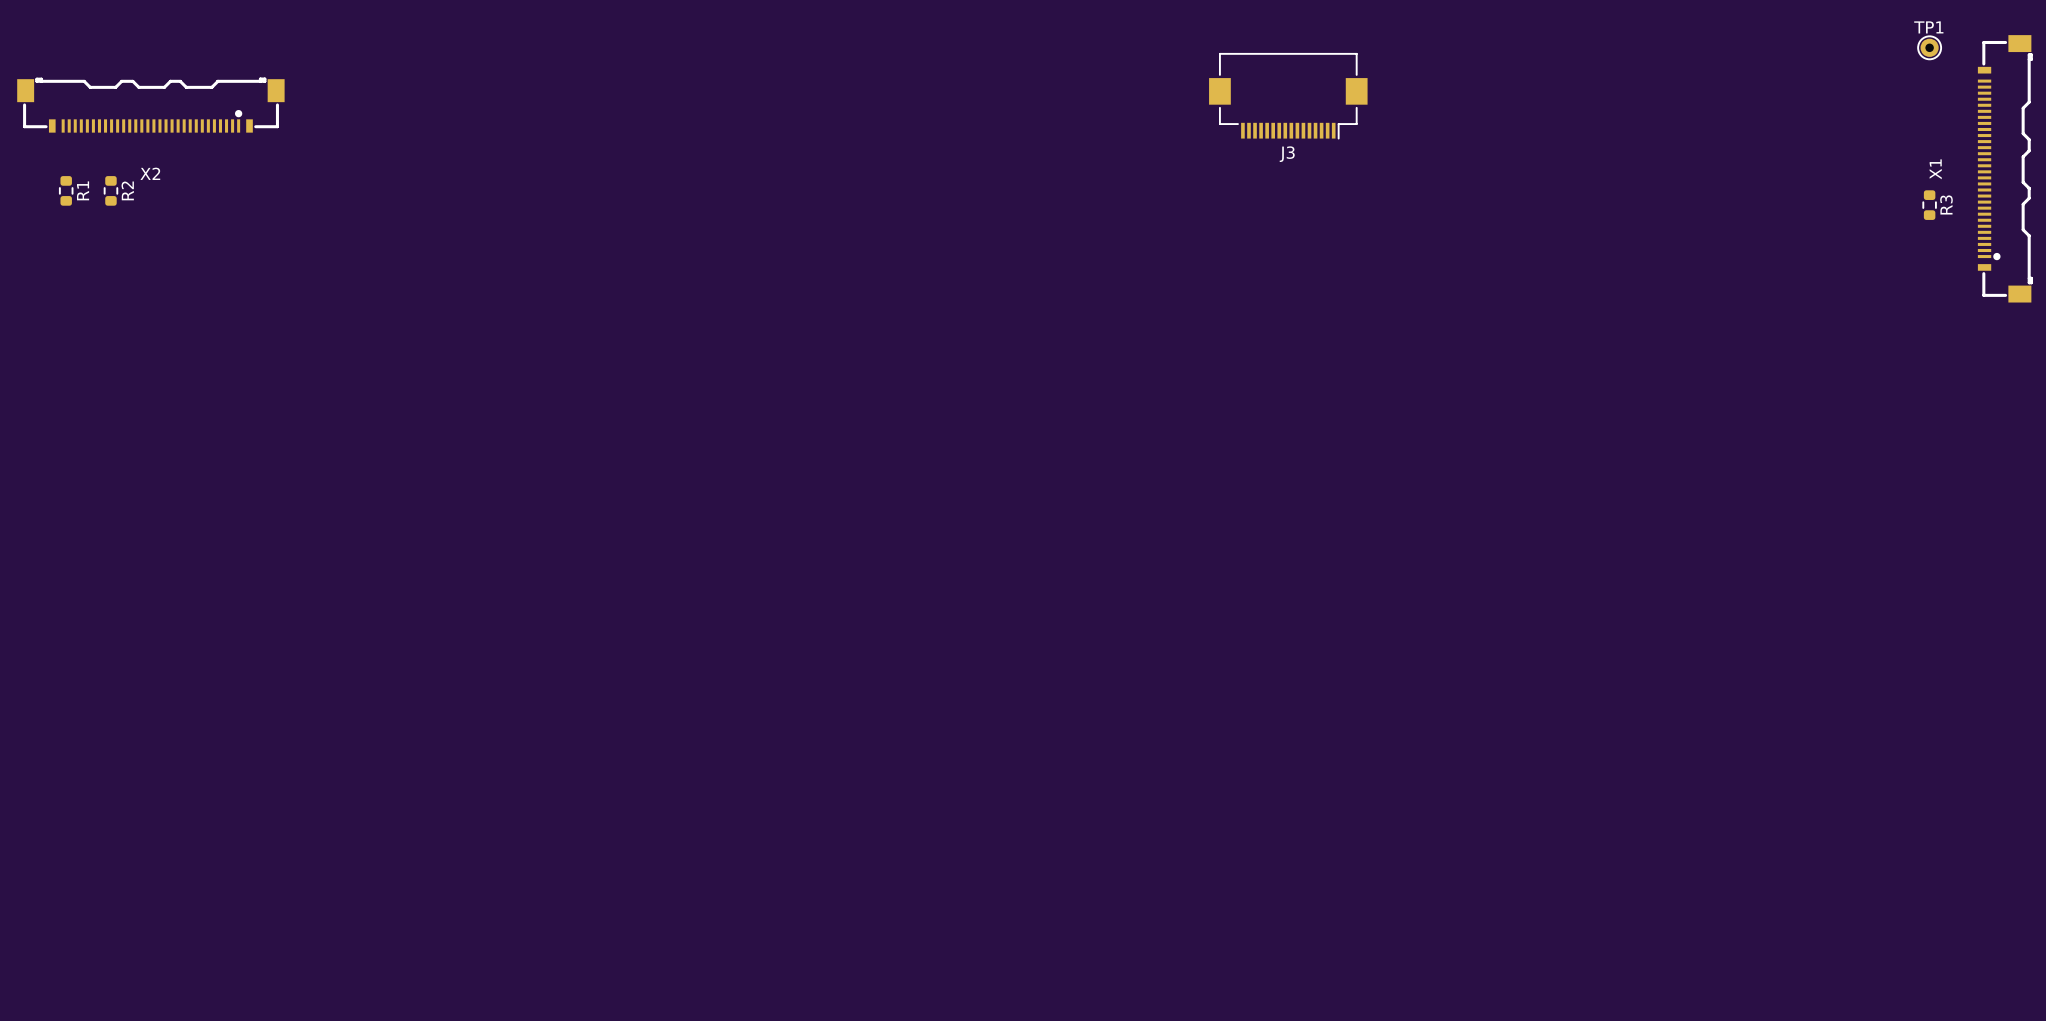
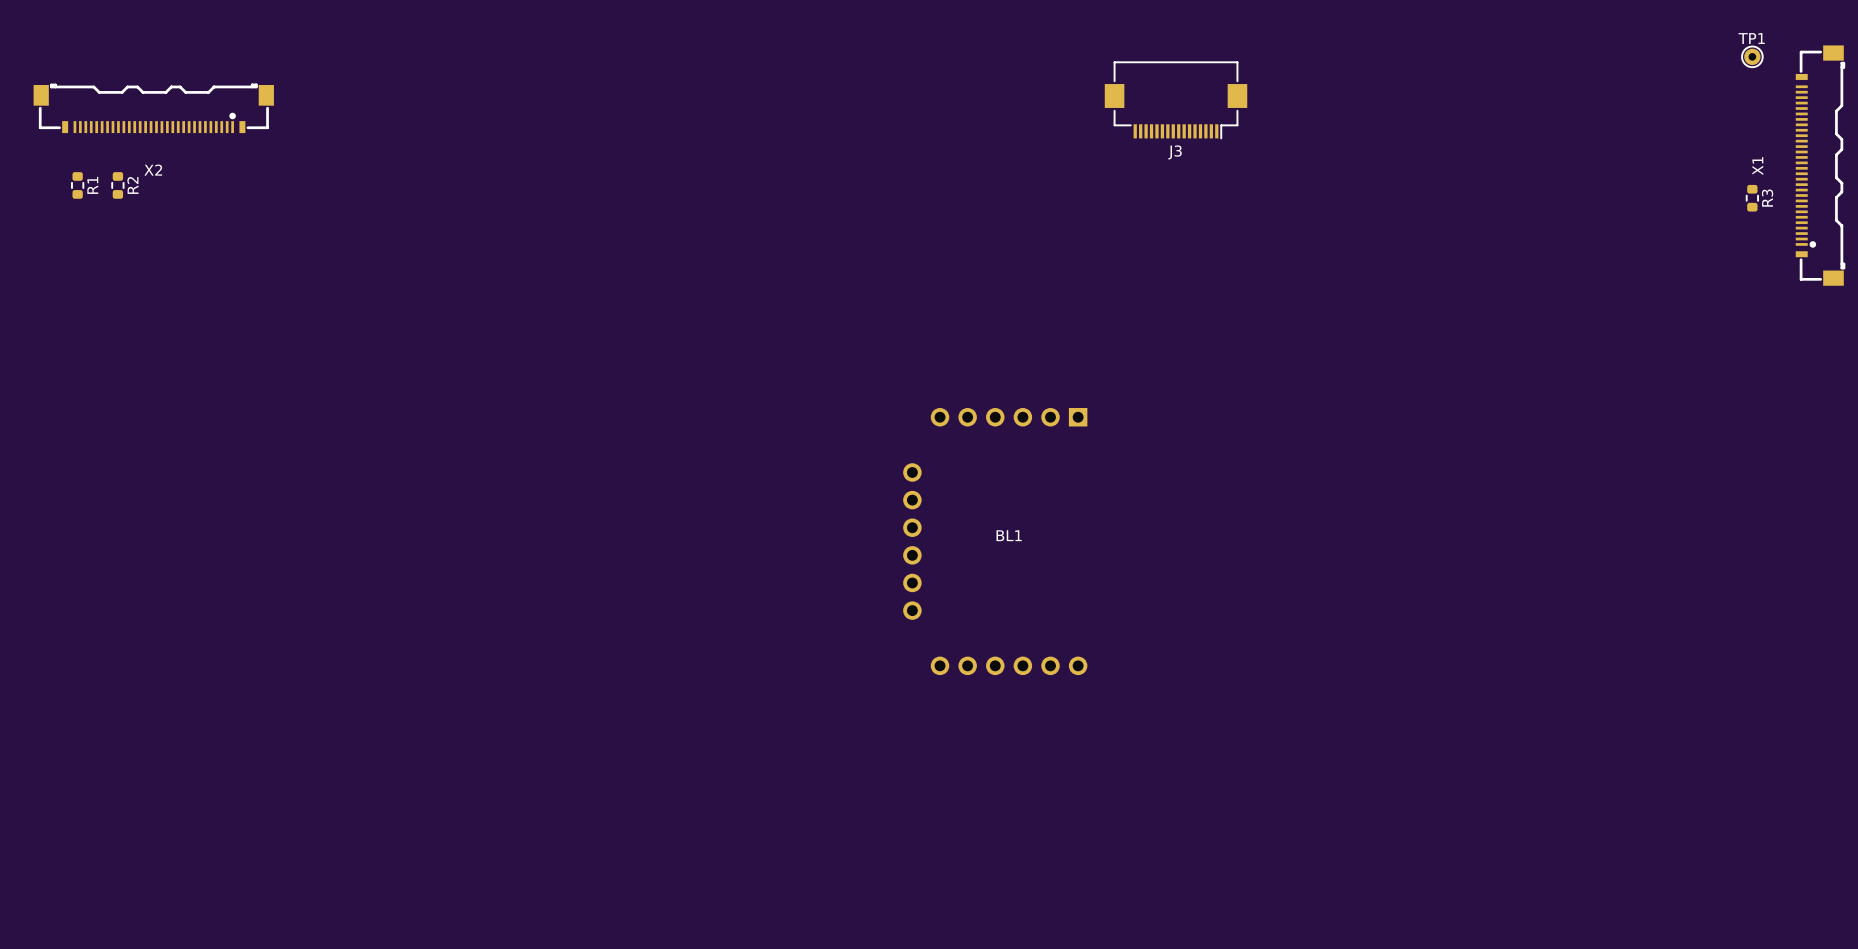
BL1: none -> (995, 541)

